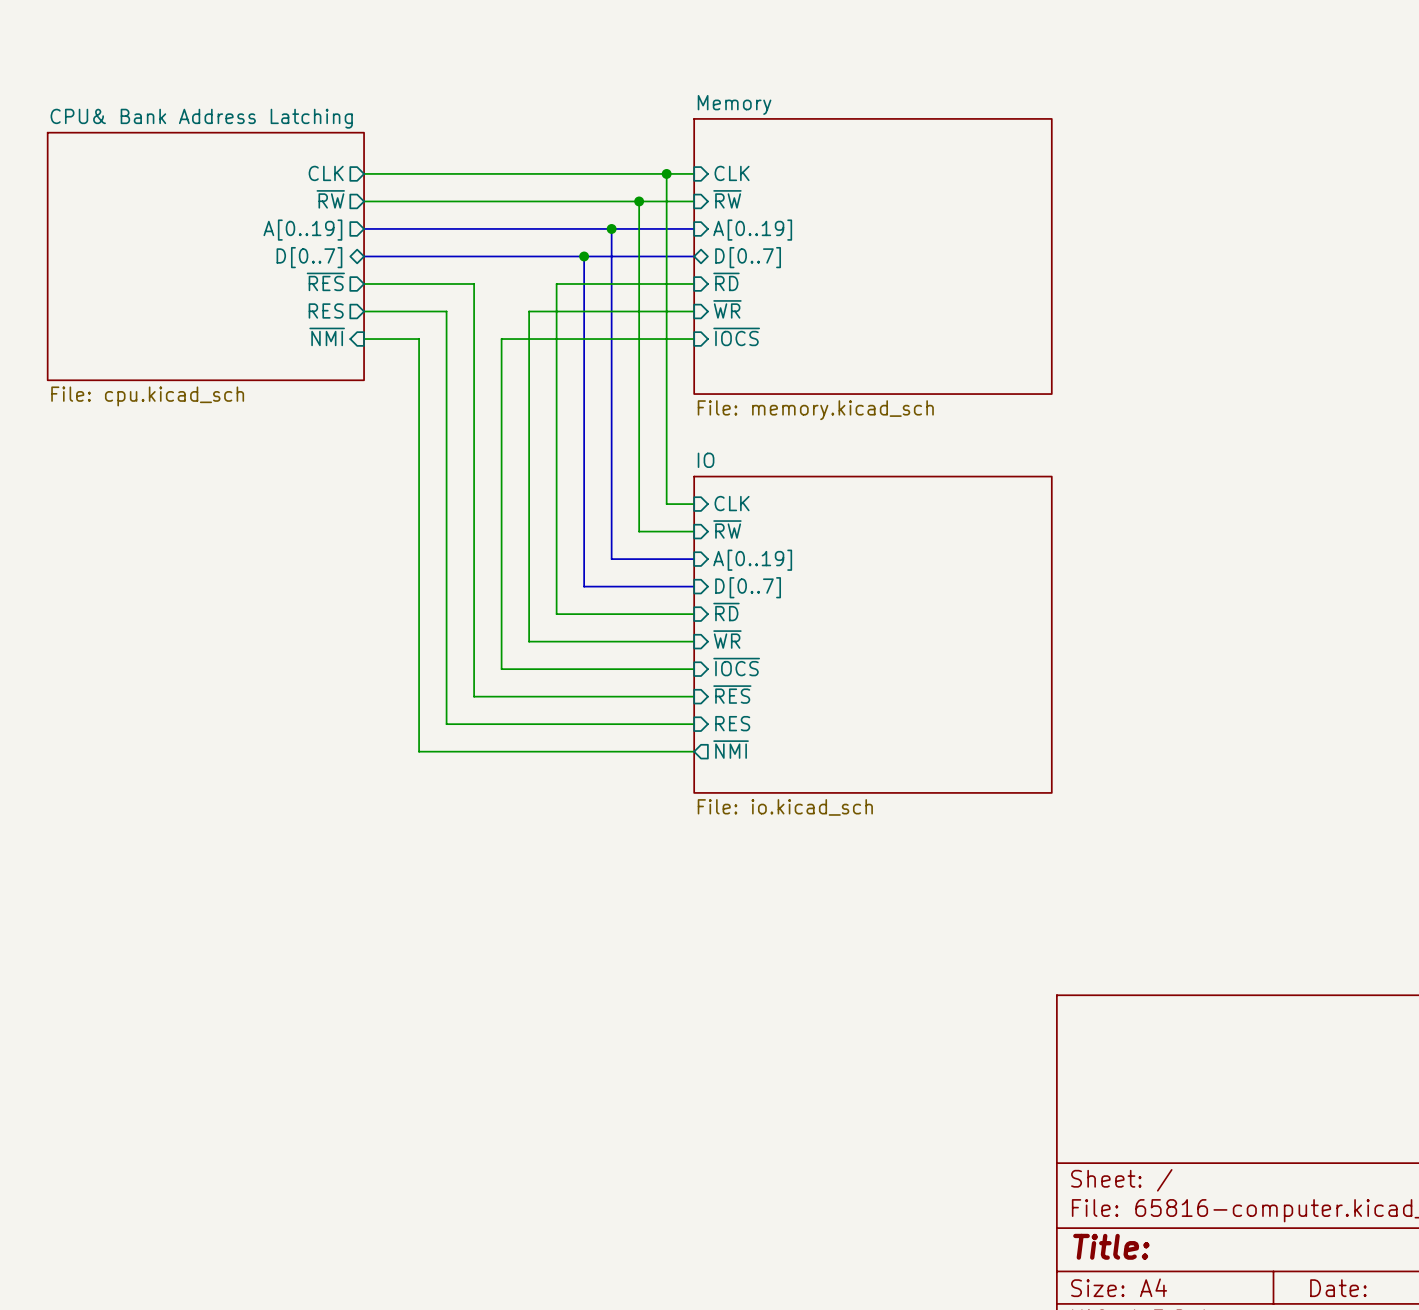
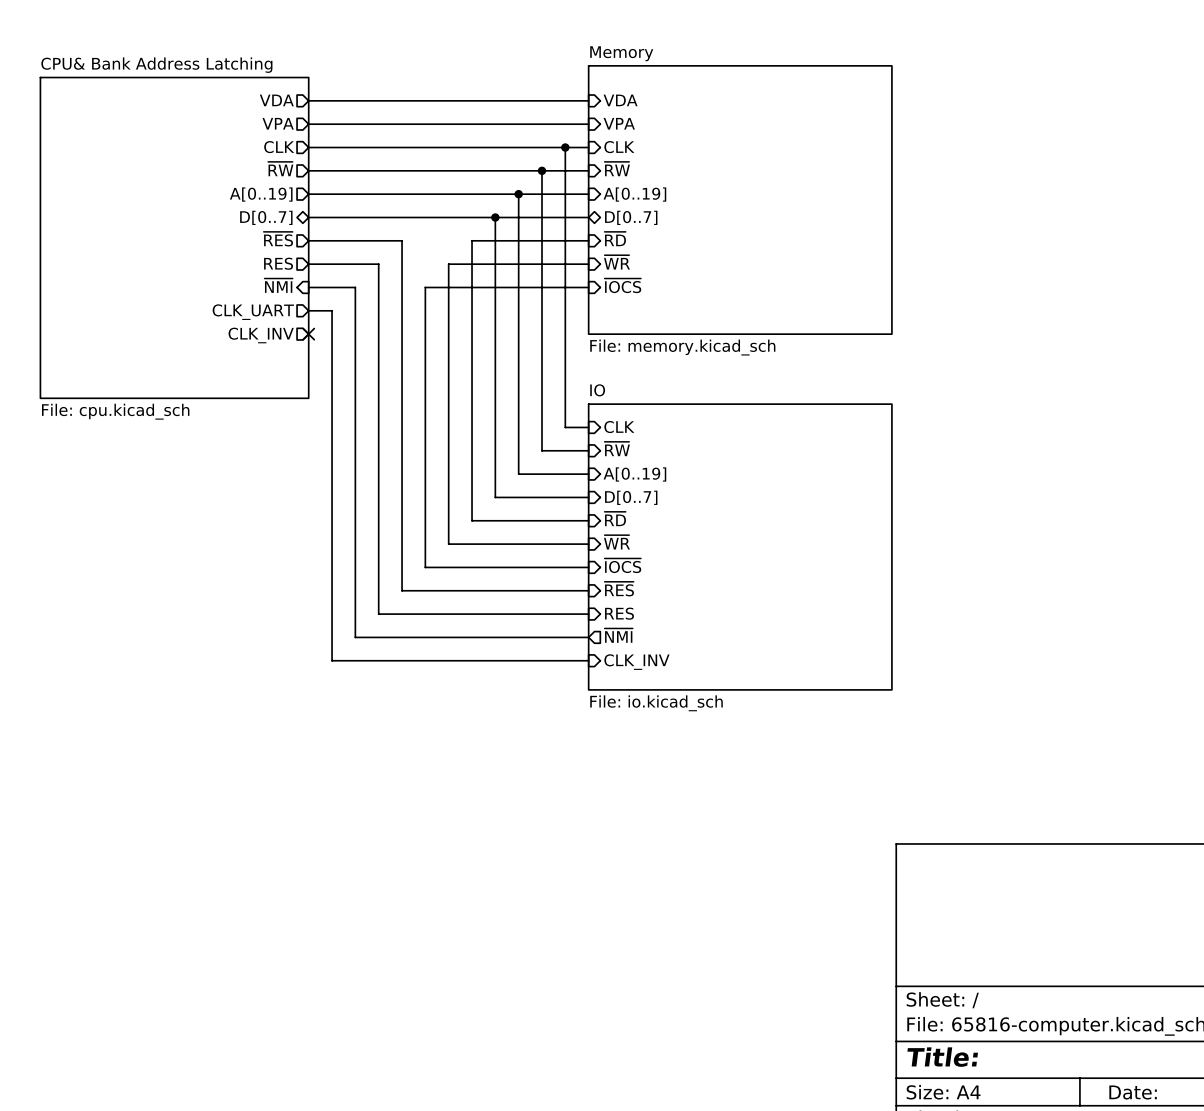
sheet pin: none -> VDA (276, 100)
wire: none -> (308, 100) (588, 100)
sheet pin: none -> VDA (620, 100)
sheet pin: none -> VPA (278, 123)
sheet pin: none -> VPA (619, 123)
wire: none -> (308, 124) (588, 124)
sheet Memory: none -> File: memory.kicad_sch (740, 200)
sheet CPU& Bank Address Latching: File: cpu.kicad_sch (205, 256) -> none
sheet Memory: File: memory.kicad_sch (872, 256) -> none
sheet CPU& Bank Address Latching: none -> File: cpu.kicad_sch (174, 237)
sheet pin: none -> CLK_UART (253, 312)
wire: none -> (308, 310) (332, 310) (332, 660) (588, 660)
sheet pin: none -> CLK_INV (261, 335)
no-connect mark: none -> (308, 334)
sheet IO shape: [693, 475, 1053, 794] -> [587, 403, 893, 691]
sheet pin: none -> CLK_INV (636, 662)

